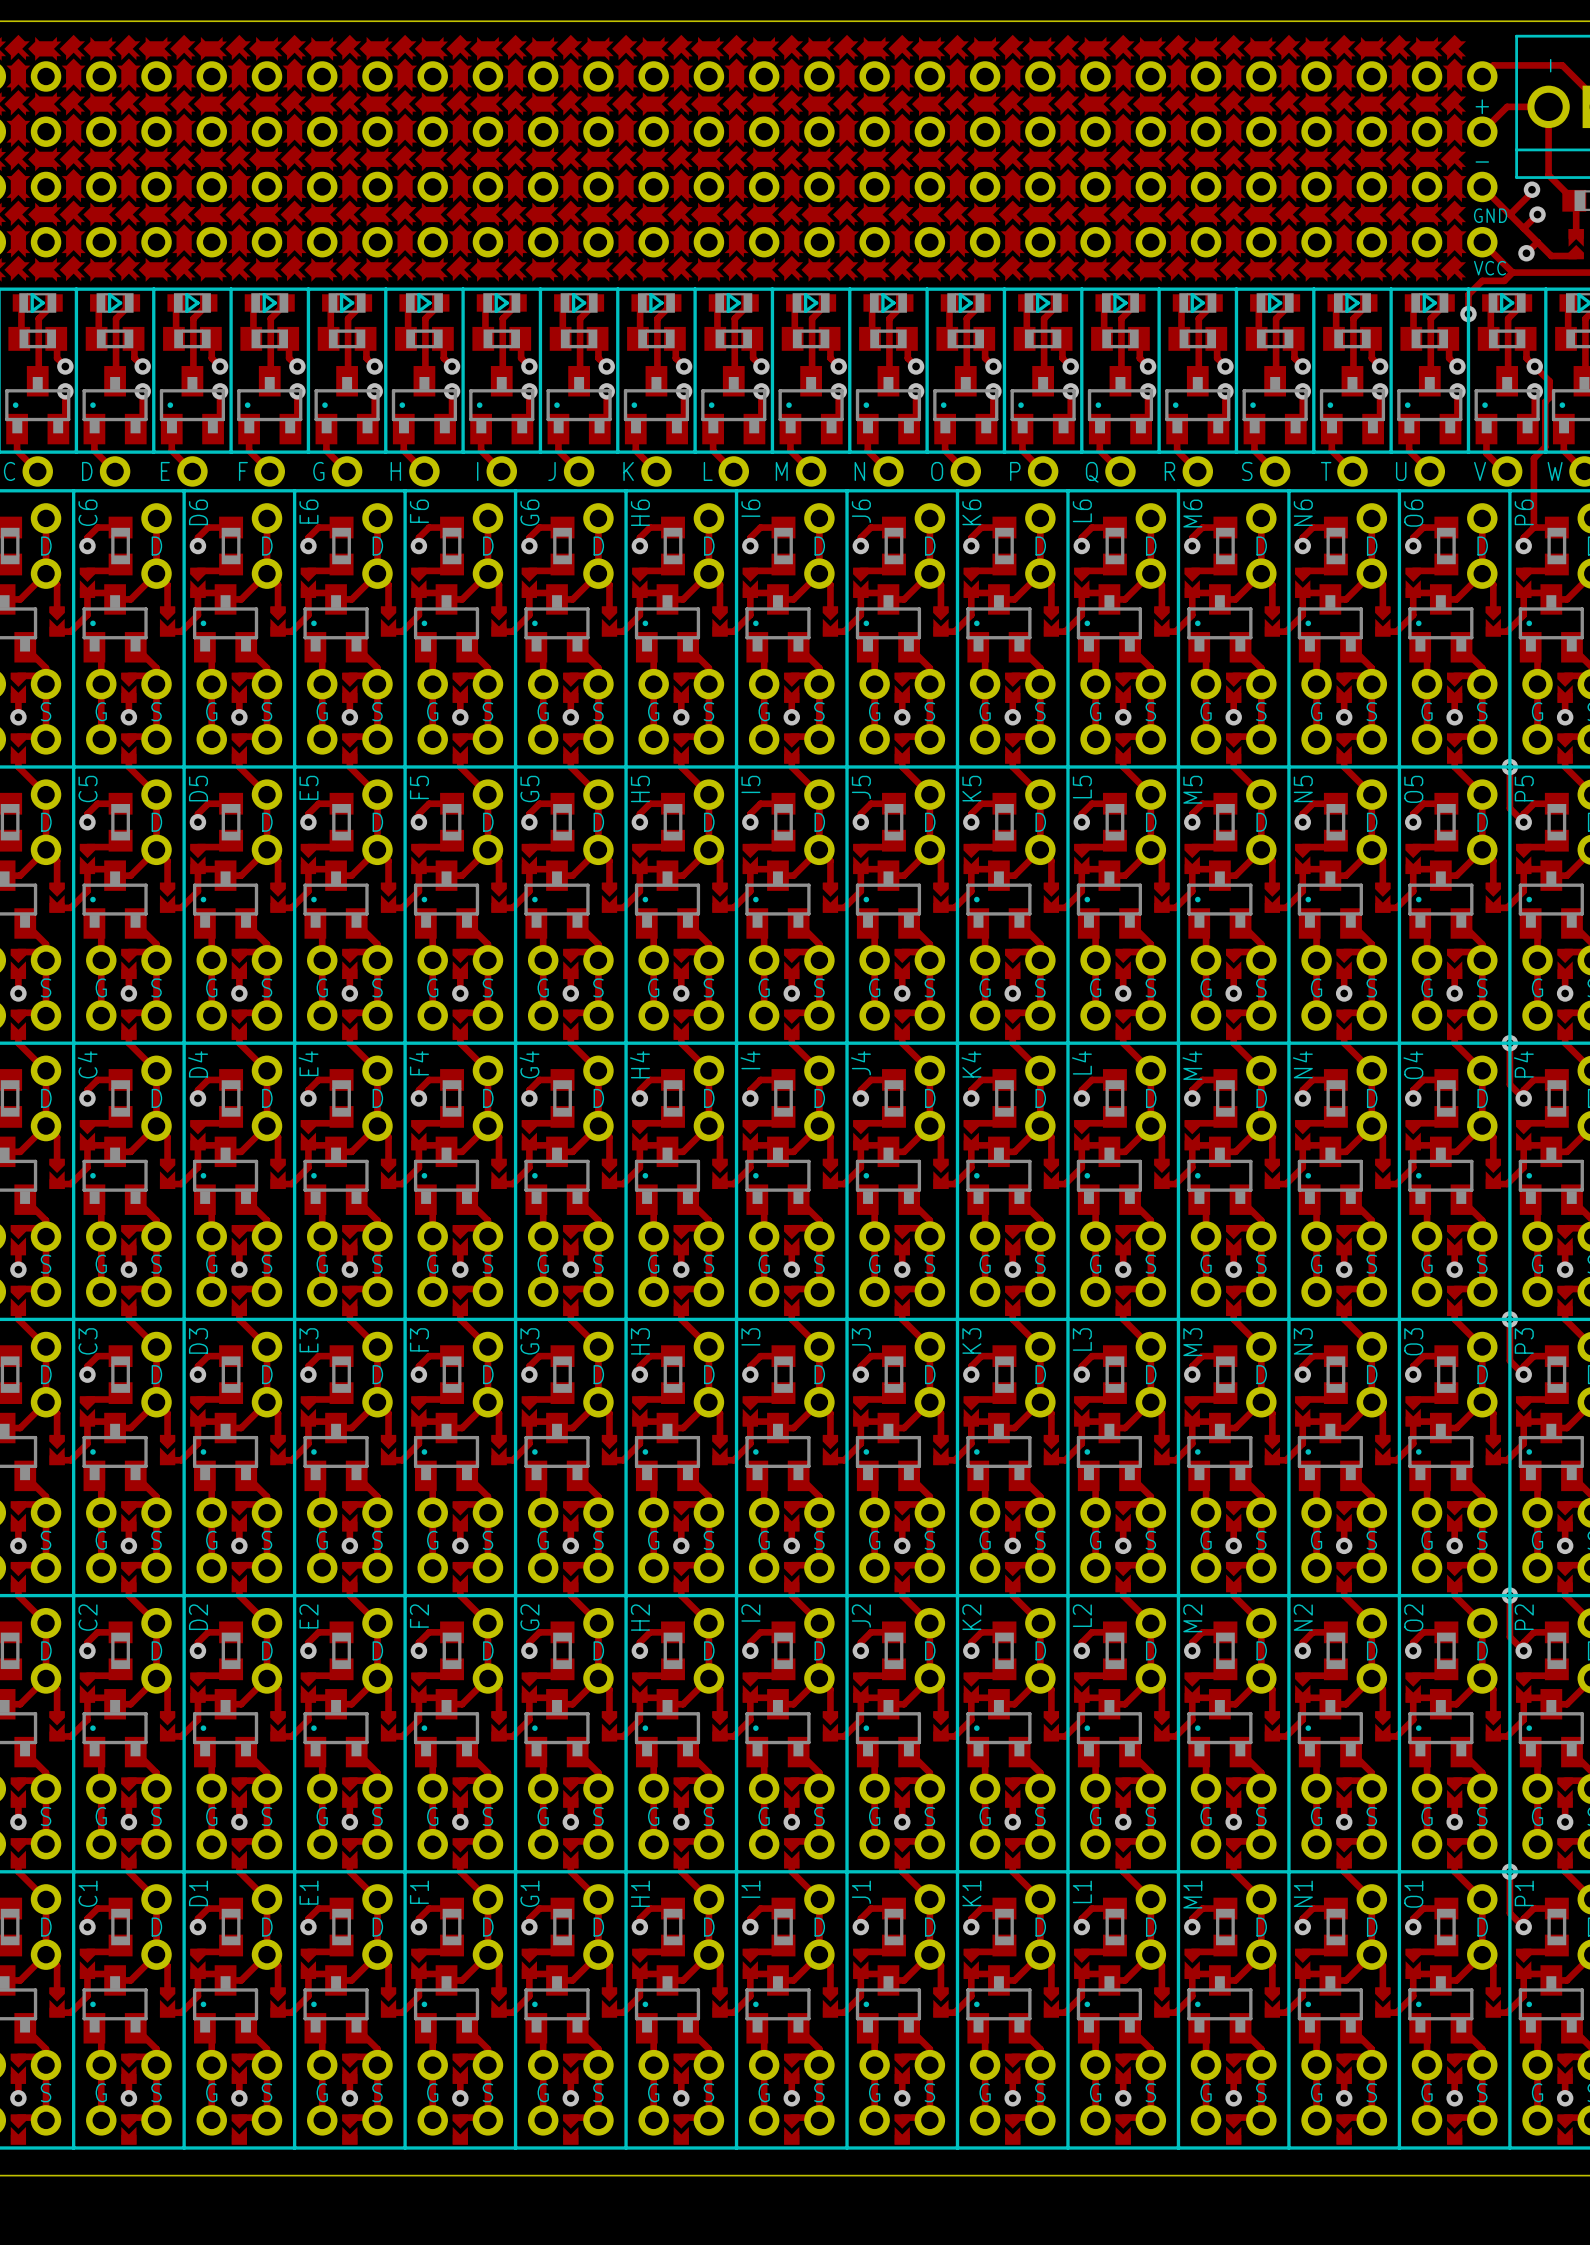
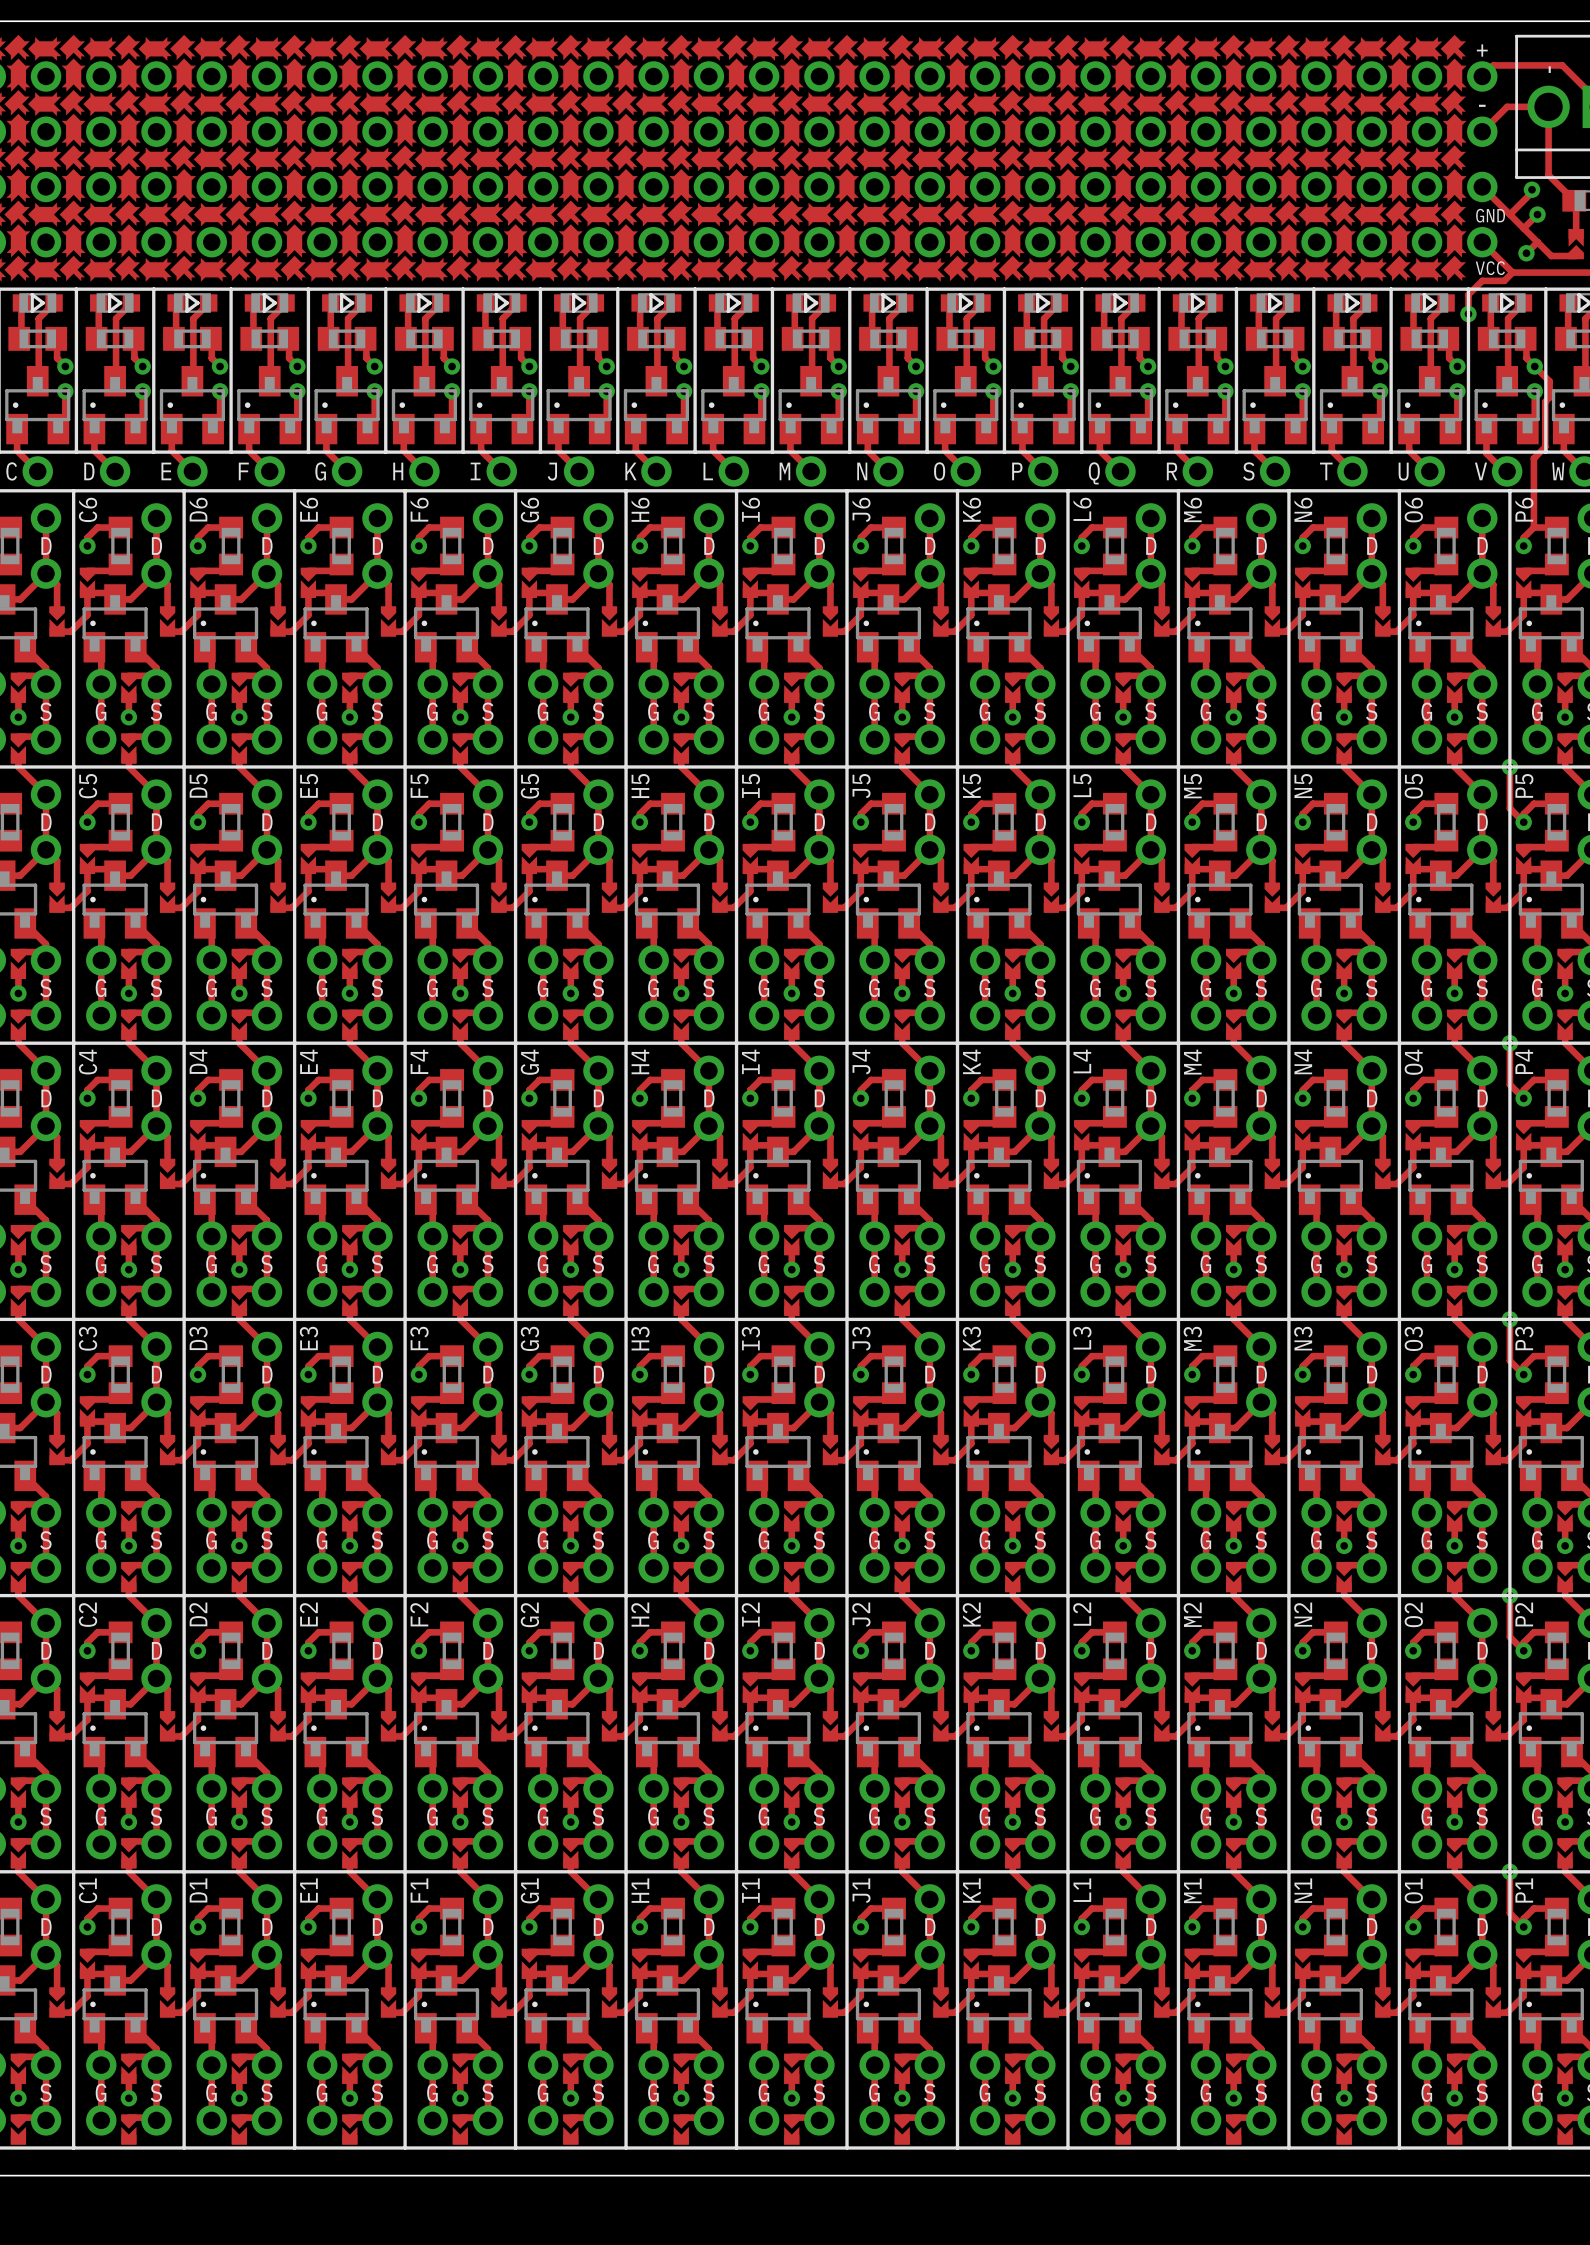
text: none -> + (1482, 50)
text: + (1482, 106) -> - (1482, 105)
text: - (1482, 162) -> none

